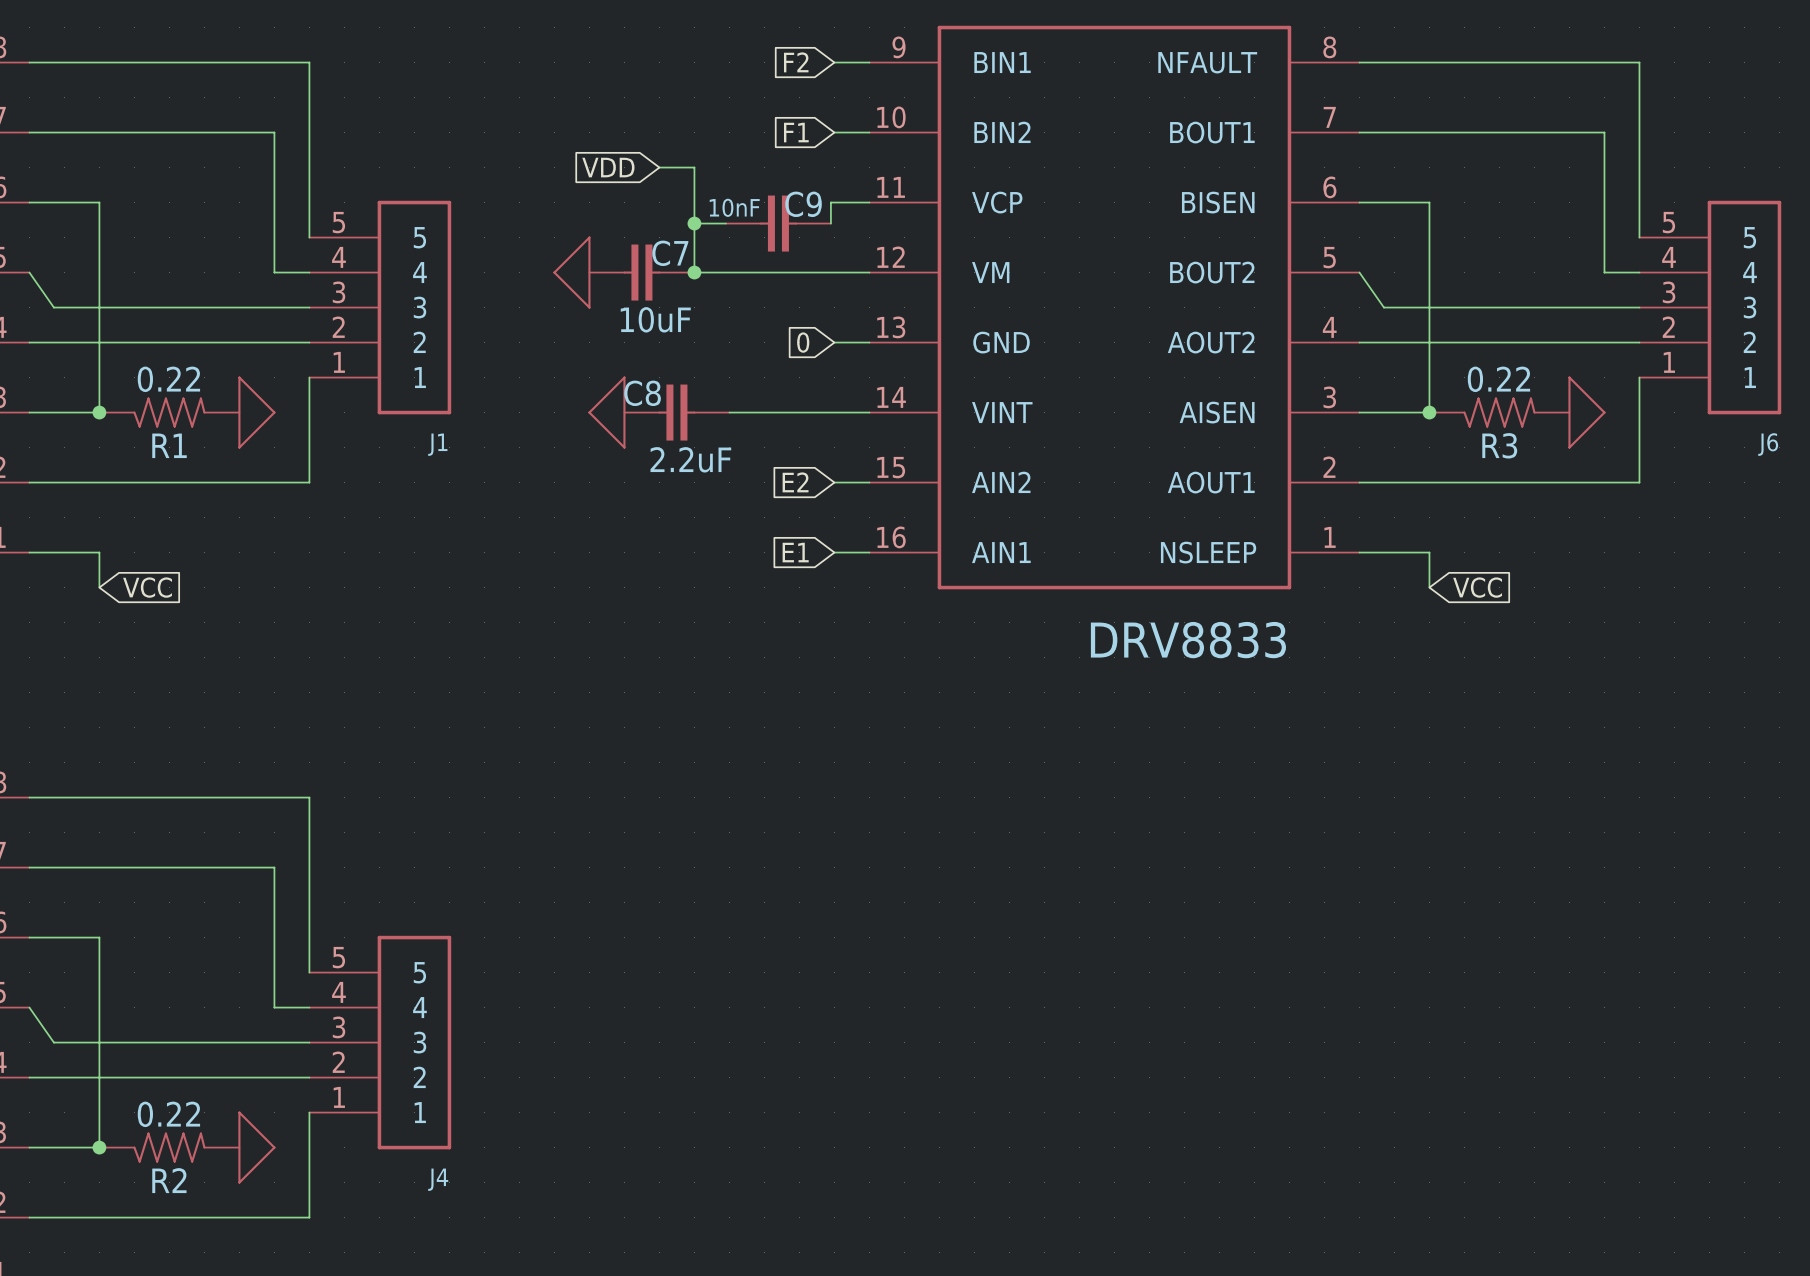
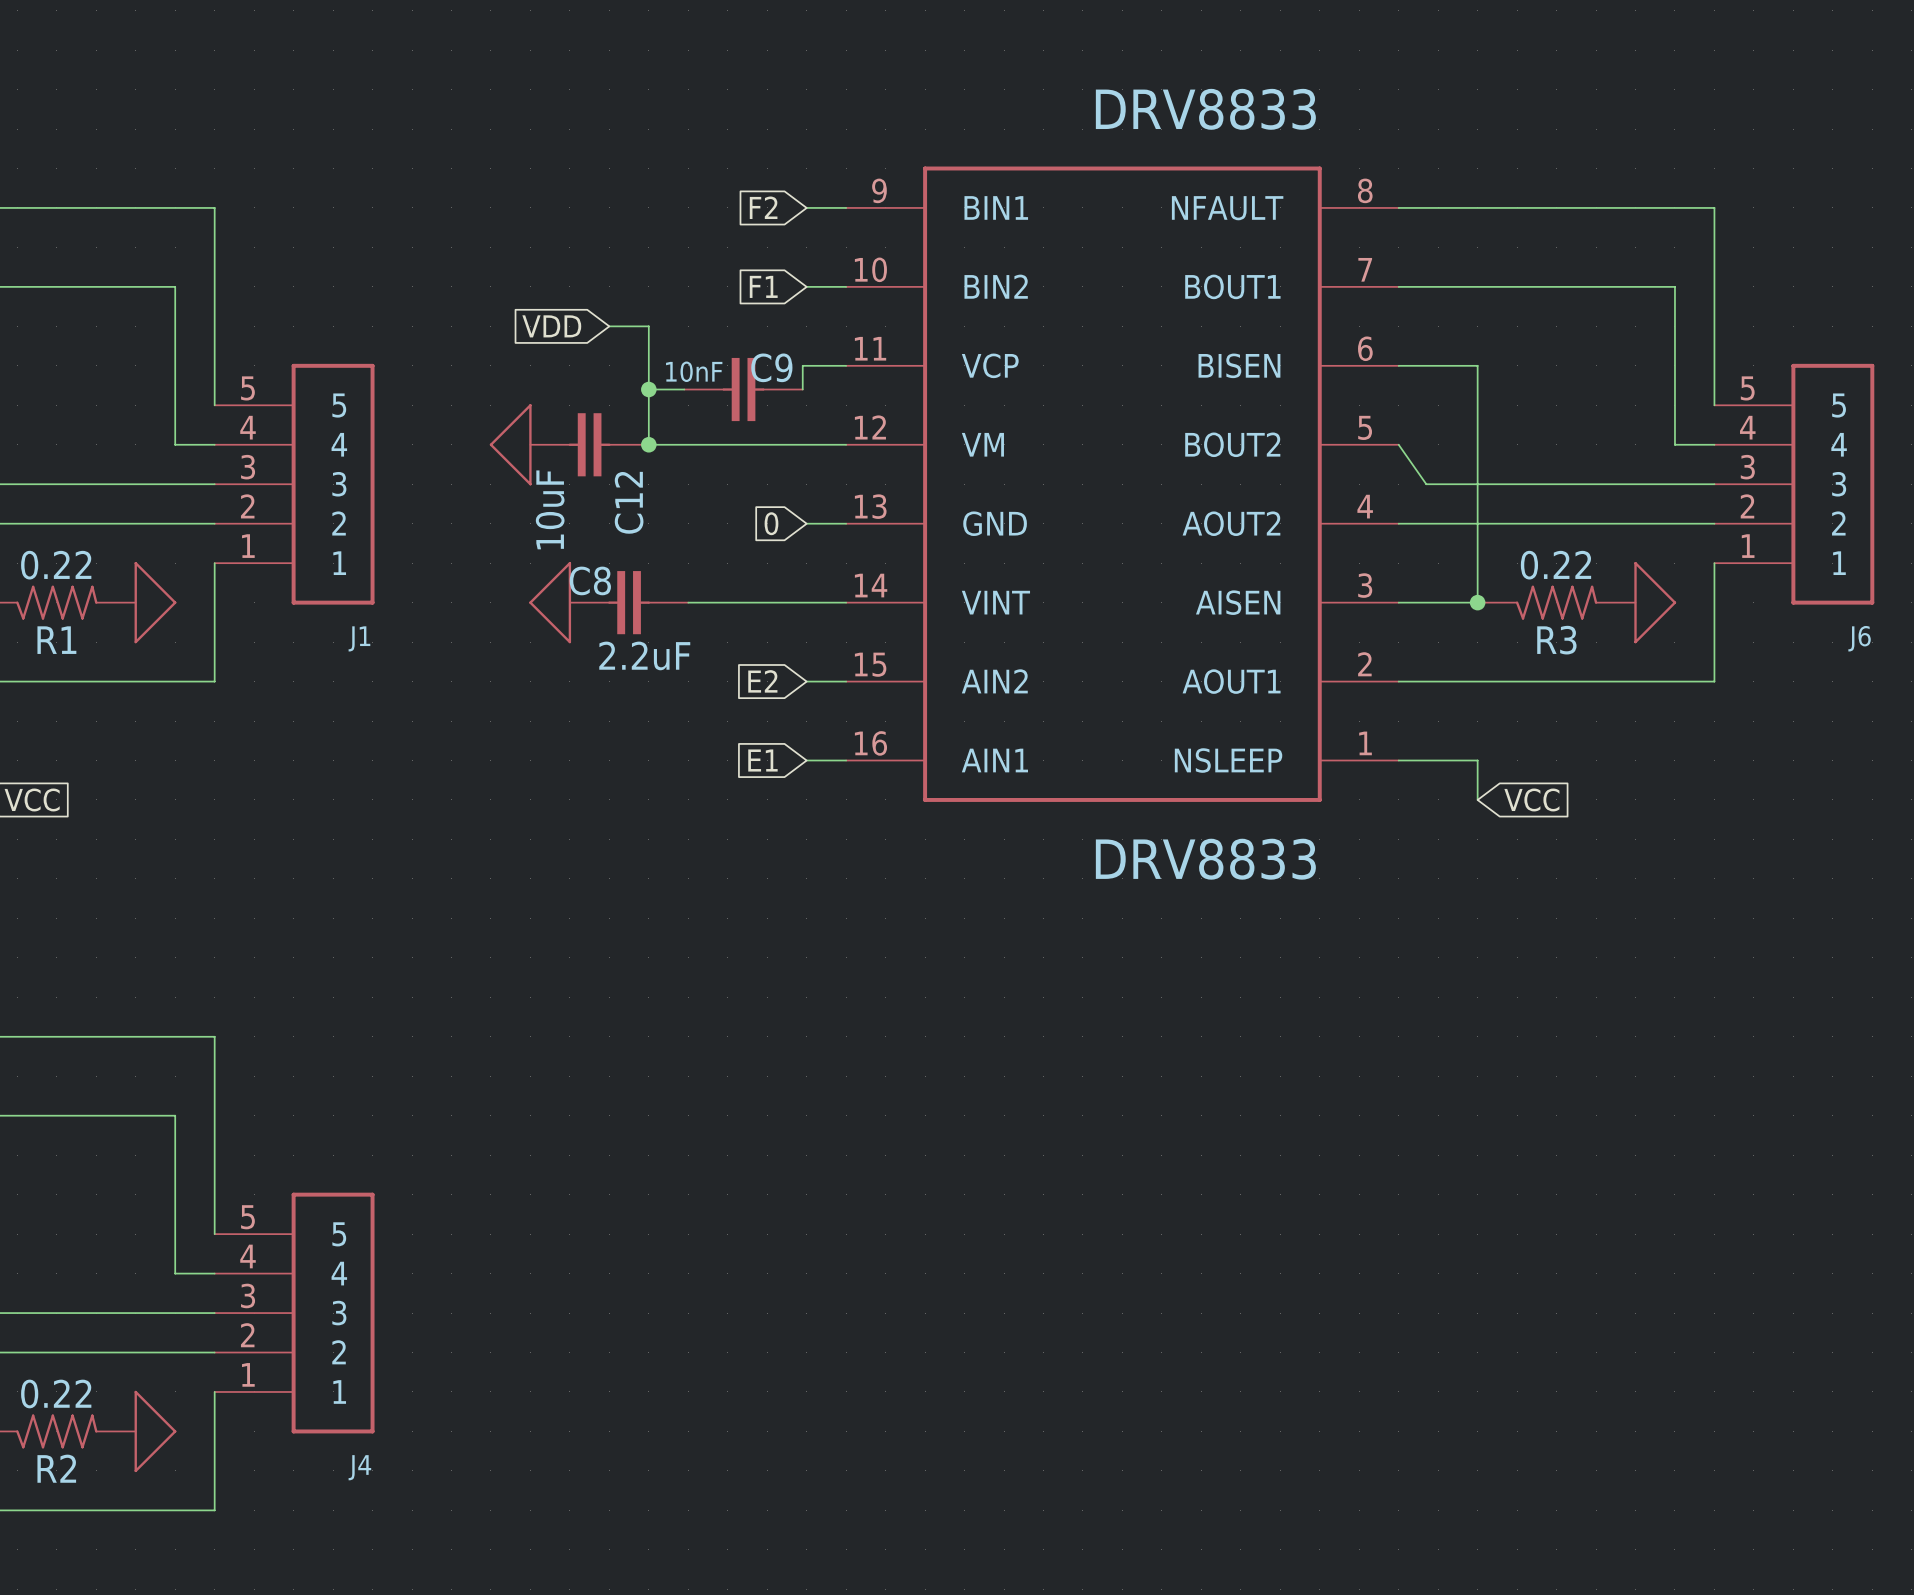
C7 name: C7 (670, 253) -> C12 (629, 502)
C7 value rotation: 0° (655, 319) -> 90° counterclockwise (550, 509)

